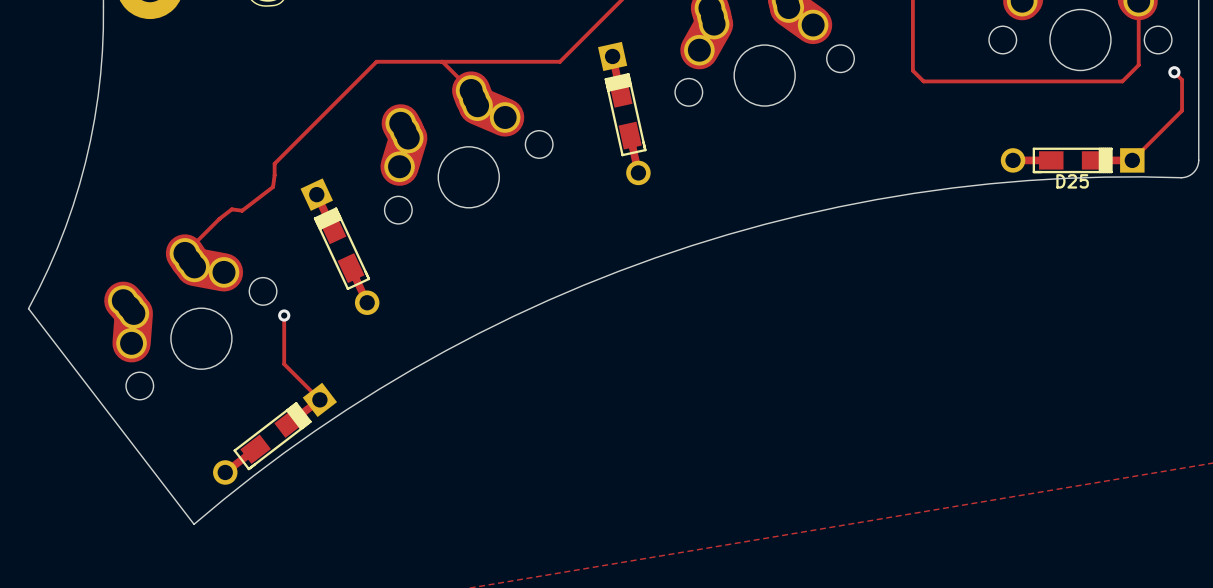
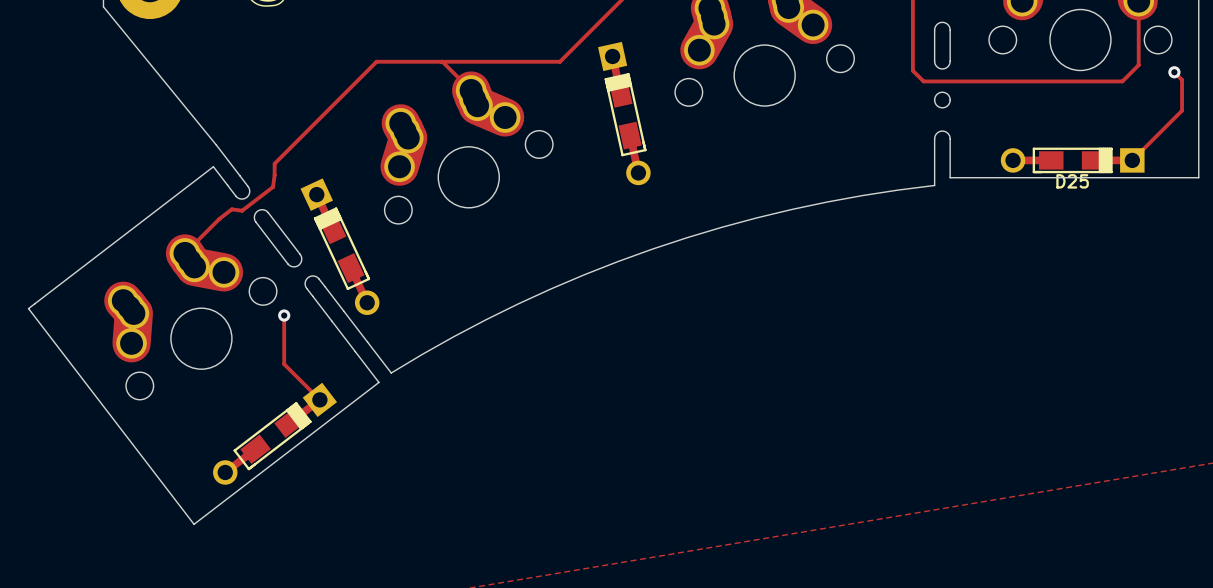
board edge: (103, 6) (100, 74) (94, 118) (85, 162) (65, 226) (48, 268) (28, 308) -> (103, 6) (216, 144) (248, 186) (249, 193) (244, 198) (237, 197) (213, 166) (28, 308)
board edge: none -> (934, 30) (934, 63) (938, 67) (944, 68) (950, 62) (949, 28) (947, 23) (941, 22) (936, 24) (934, 30)
board edge: none -> (934, 100) (936, 94) (942, 92) (947, 94) (950, 100) (947, 105) (942, 107) (936, 105) (934, 100)
board edge: (1198, 160) (1193, 172) (1183, 177) (1104, 177) (1028, 180) (952, 188) (876, 199) (764, 224) (654, 258) (548, 300) (479, 333) (412, 369) (346, 409) (283, 453) (194, 524) -> (1198, 160) (1198, 177) (950, 177) (949, 136) (946, 132) (940, 131) (934, 137) (934, 185) (862, 195) (791, 209) (721, 227) (652, 249) (584, 274) (518, 303) (453, 336) (391, 372) (319, 279) (314, 276) (309, 276) (305, 281) (306, 287) (378, 382) (194, 524)
board edge: none -> (268, 212) (300, 255) (301, 261) (297, 265) (292, 266) (288, 264) (255, 221) (254, 215) (258, 210) (264, 209) (268, 212)

